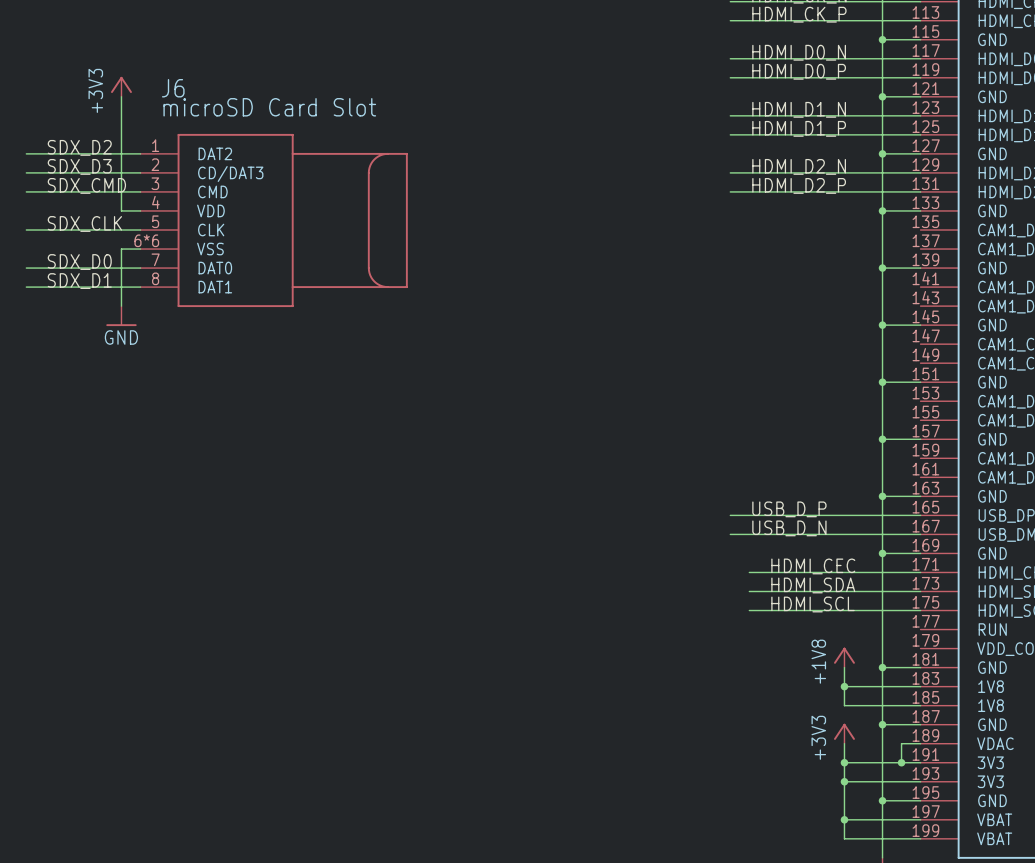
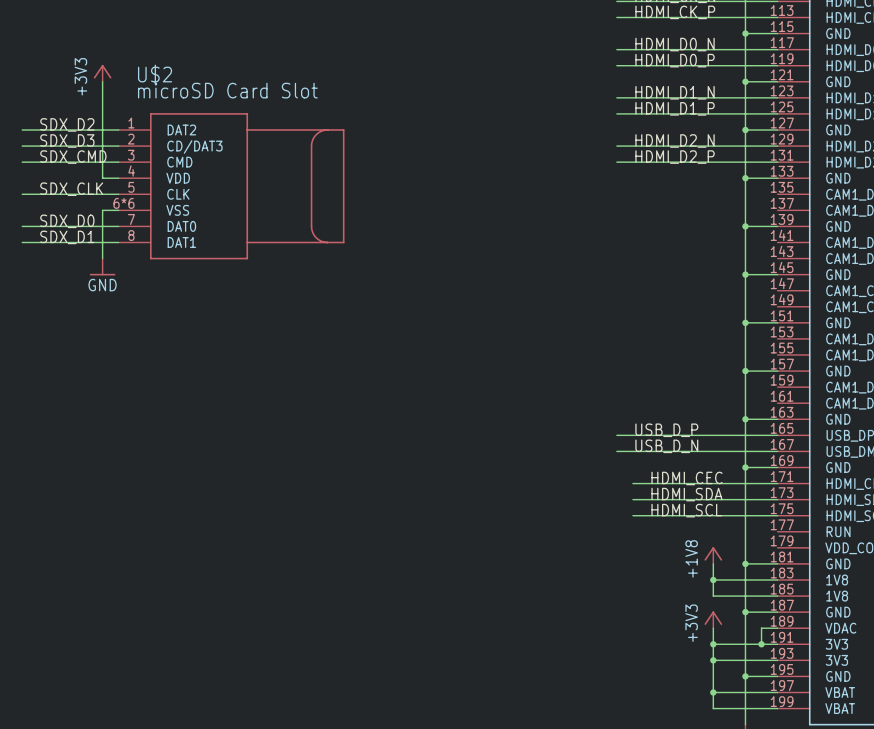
J6 name: J6 (173, 88) -> U$2 (155, 74)

